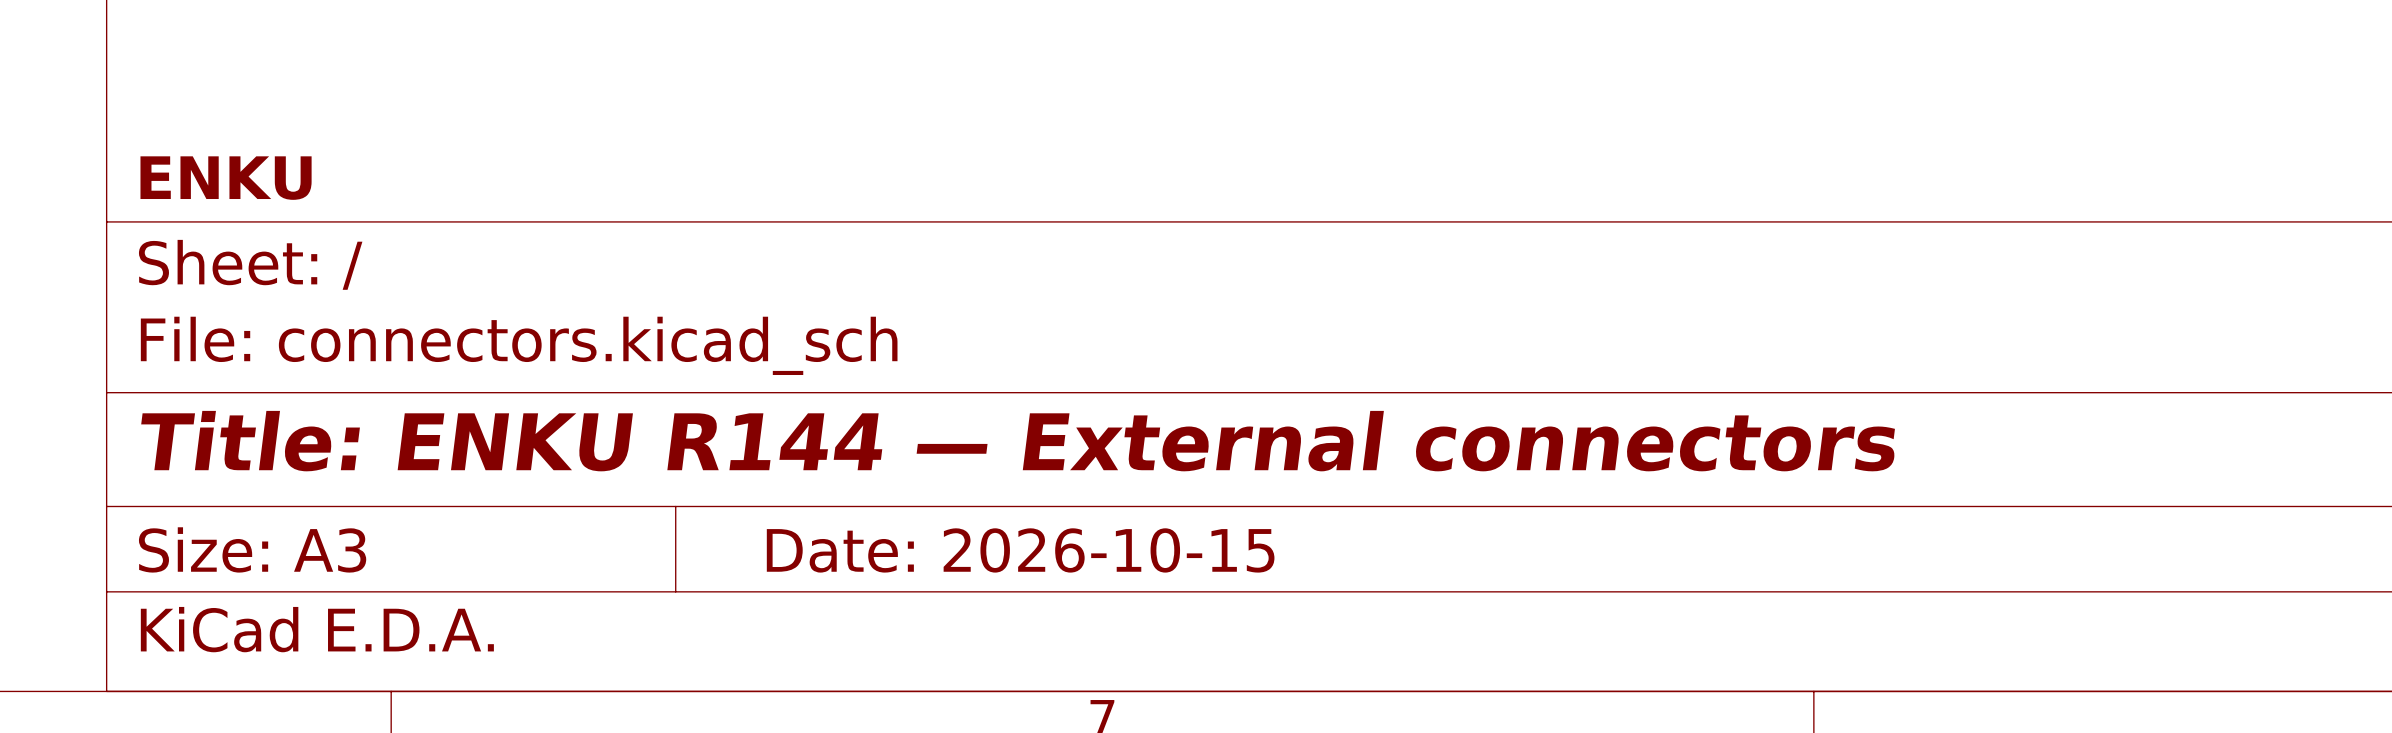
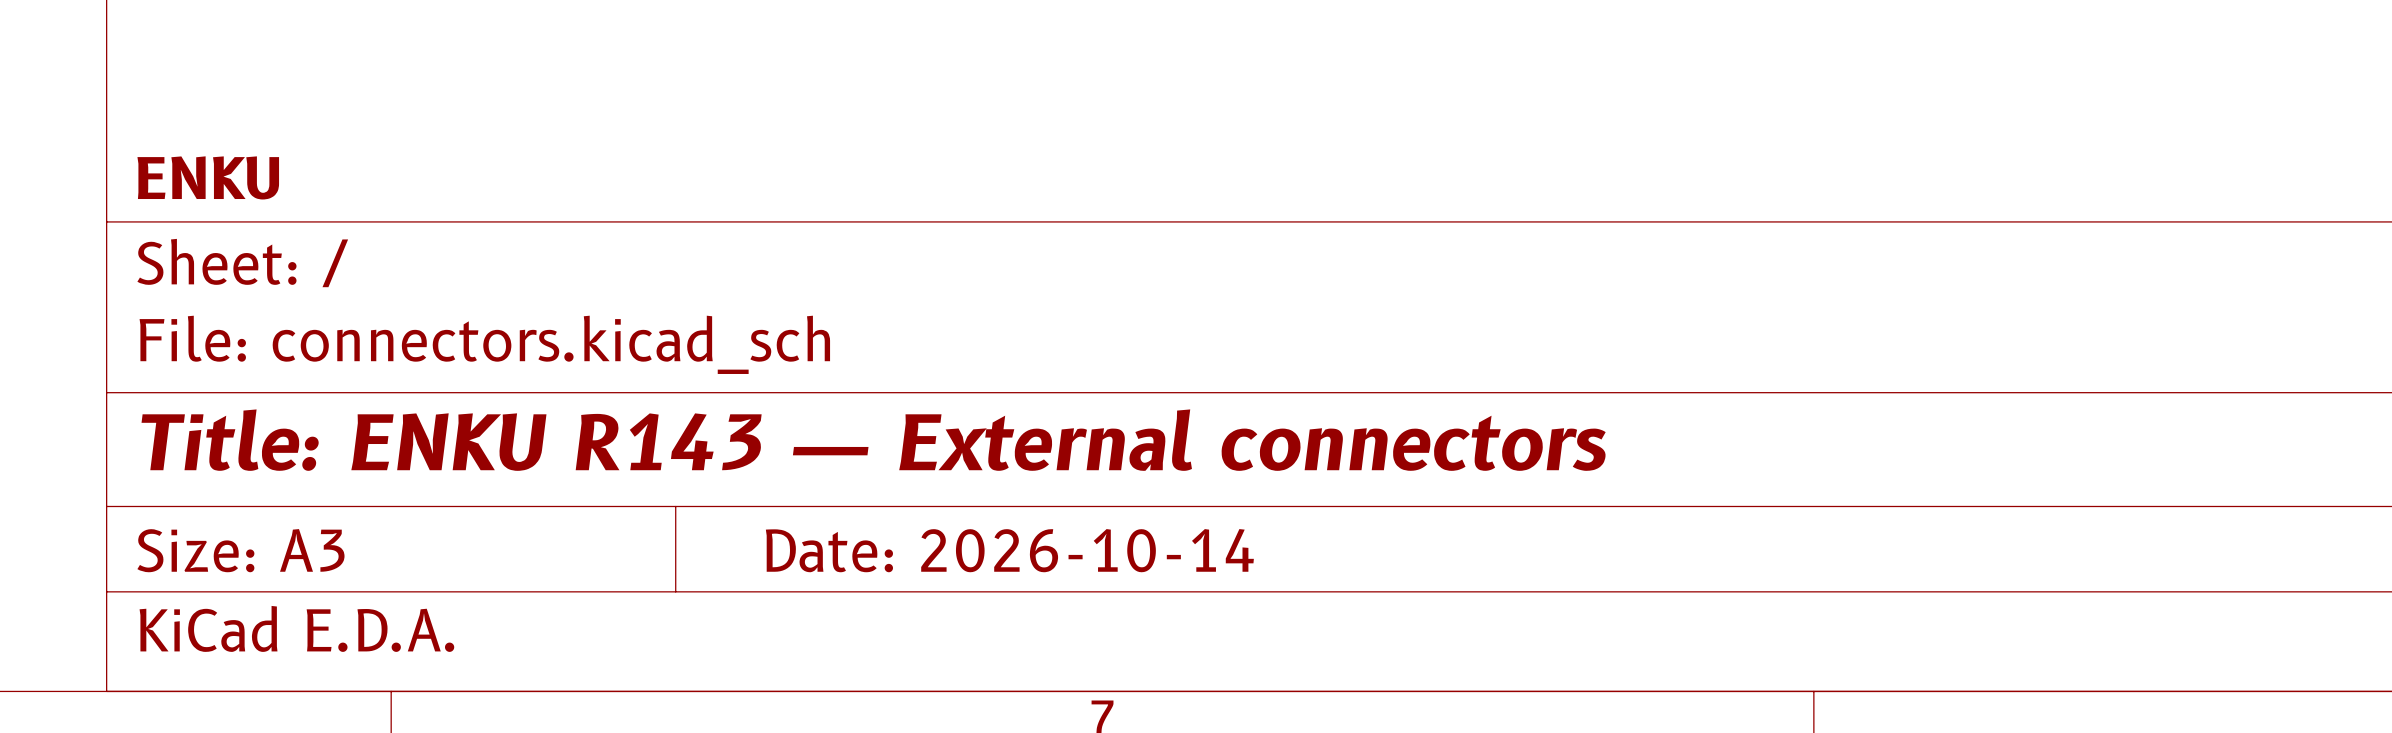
title block: Title: ENKU R144 — External connectors (1018, 441) -> Title: ENKU R143 — External connectors (873, 440)
title block: Date: 2026-10-15 (1020, 550) -> Date: 2026-10-14 (1009, 550)

